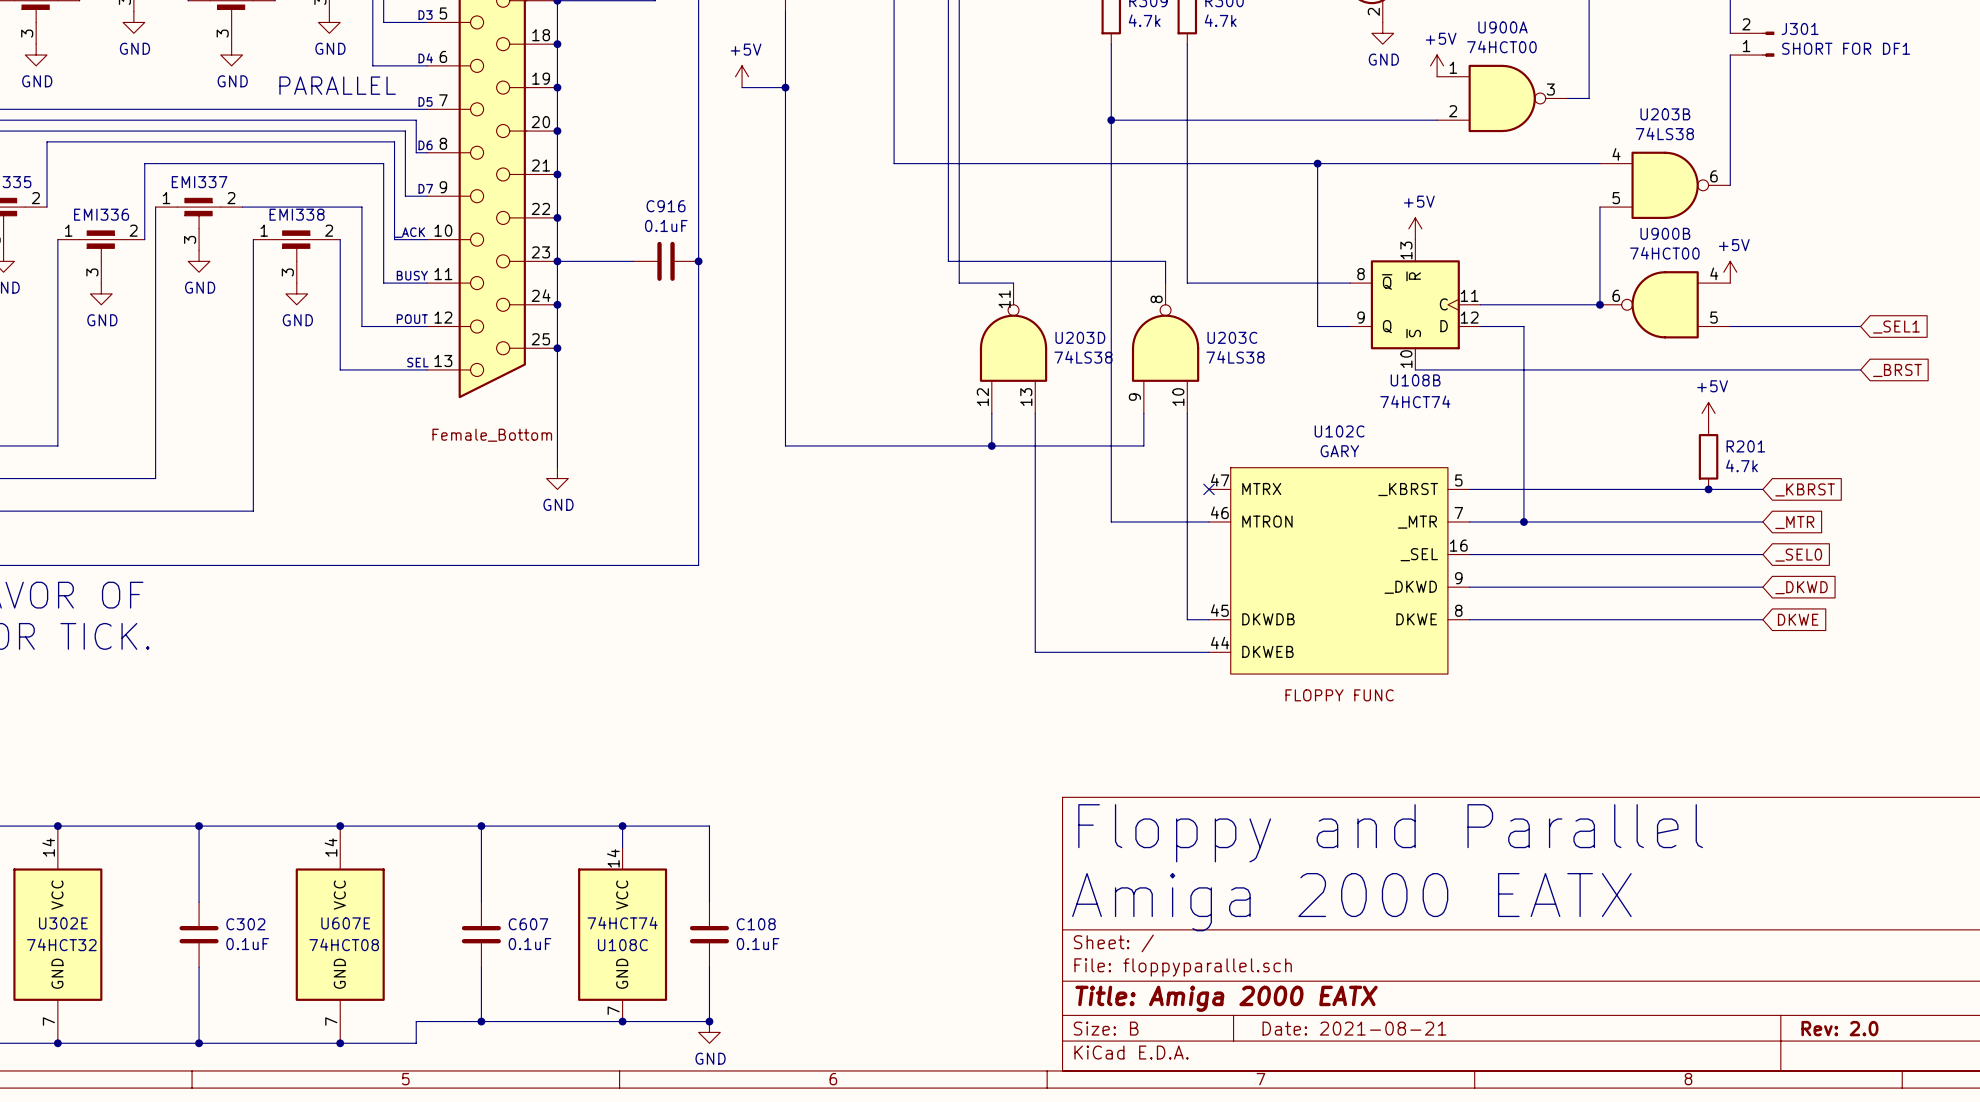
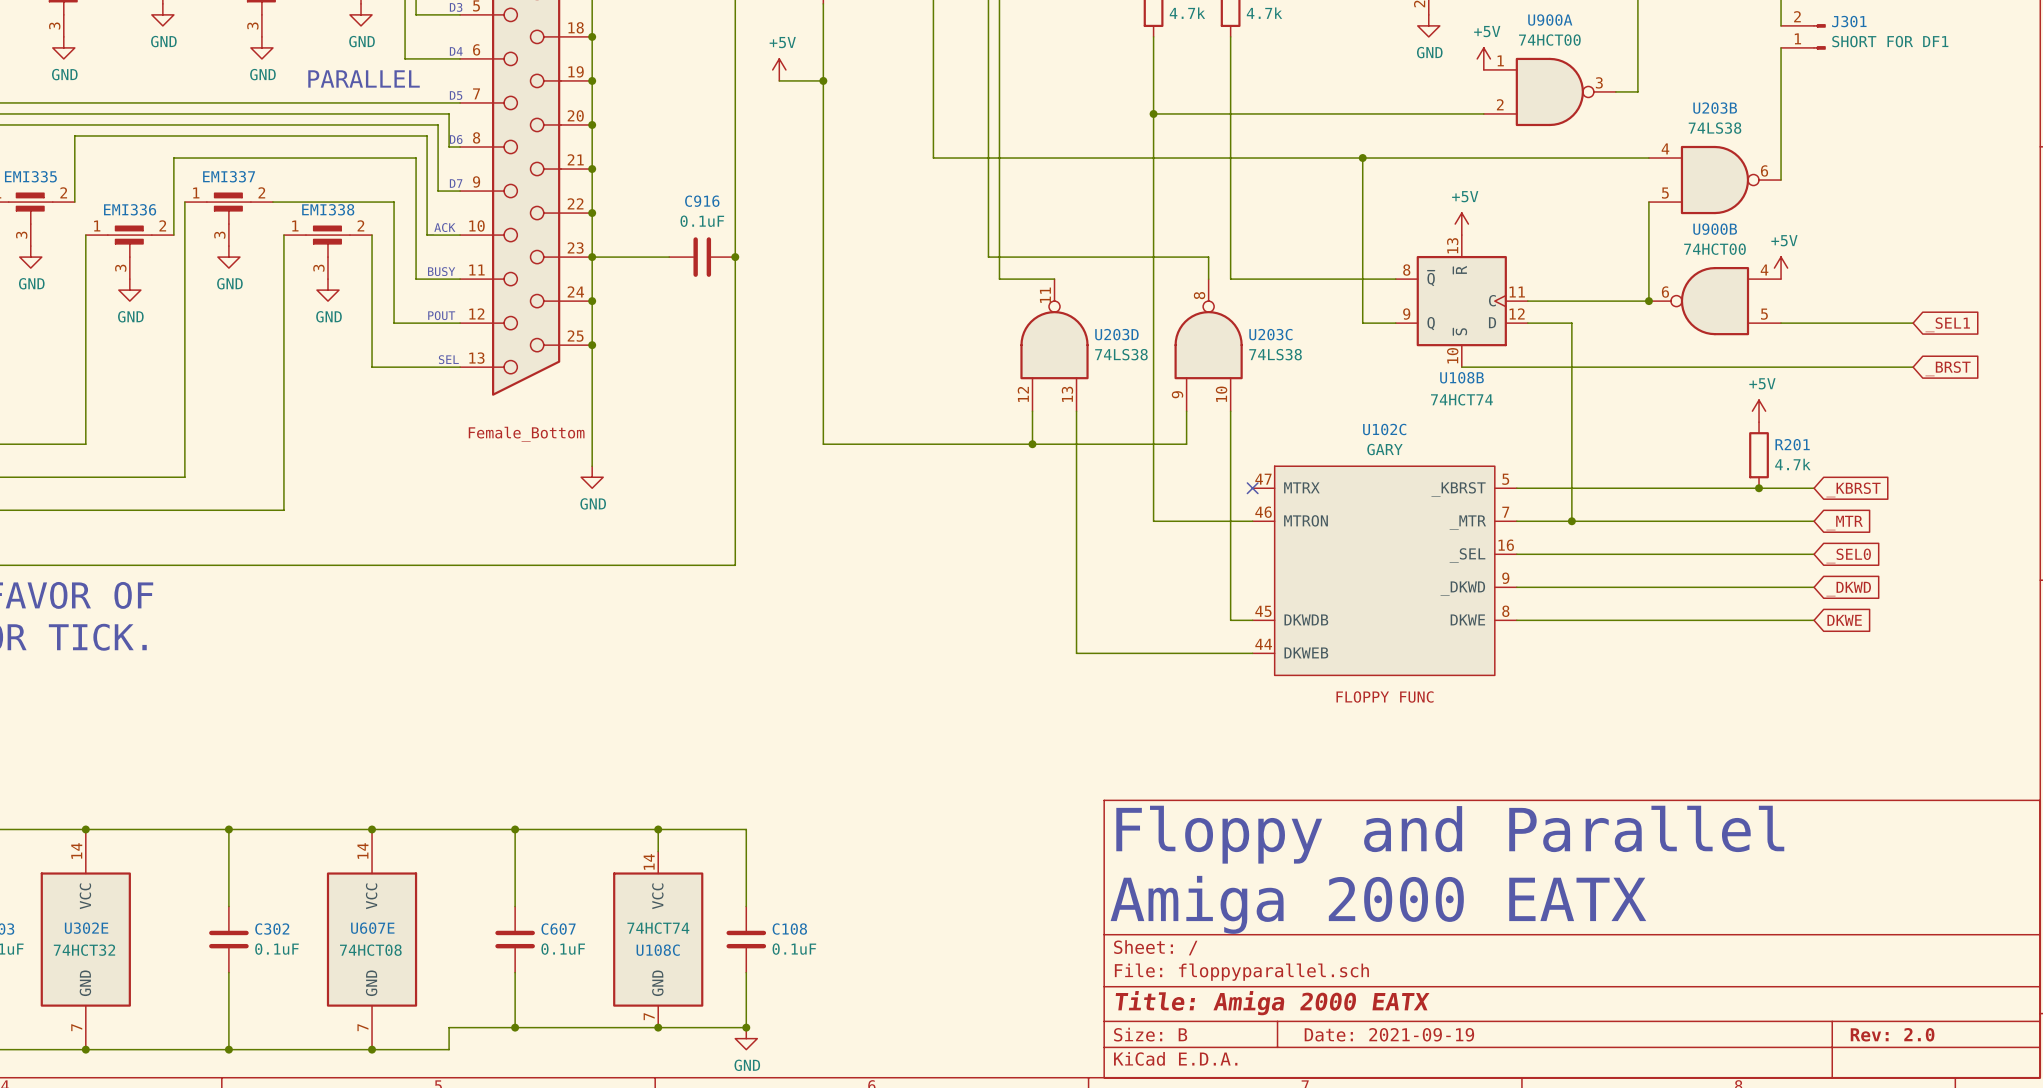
title block: Date: 2021-08-21 (1354, 1028) -> Date: 2021-09-19 (1389, 1034)

